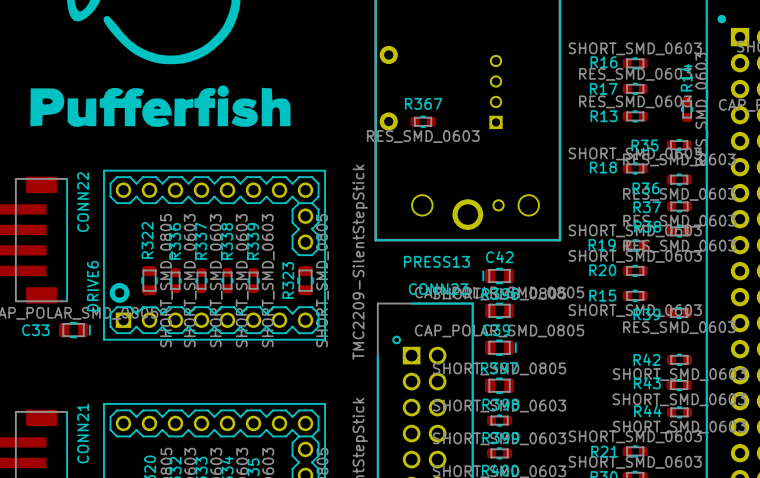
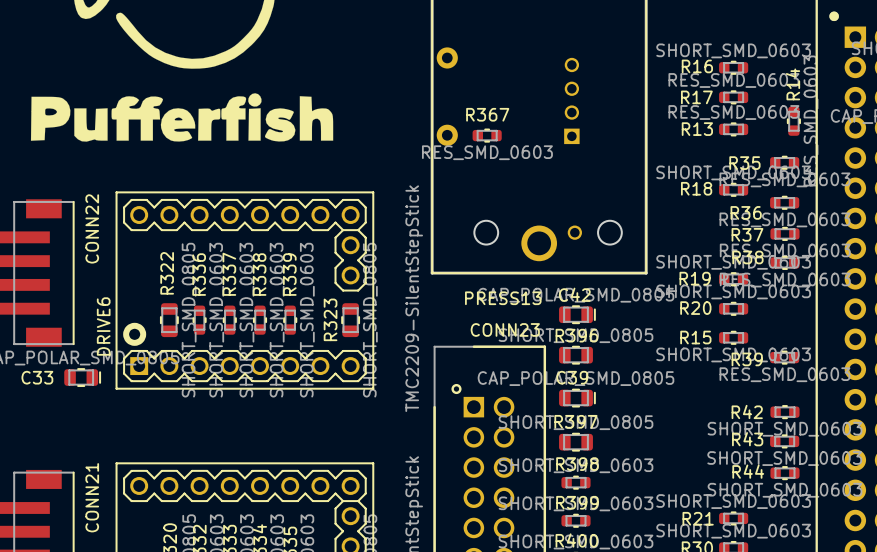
C42 rotation: 0° (498, 275) -> 180° (577, 314)

